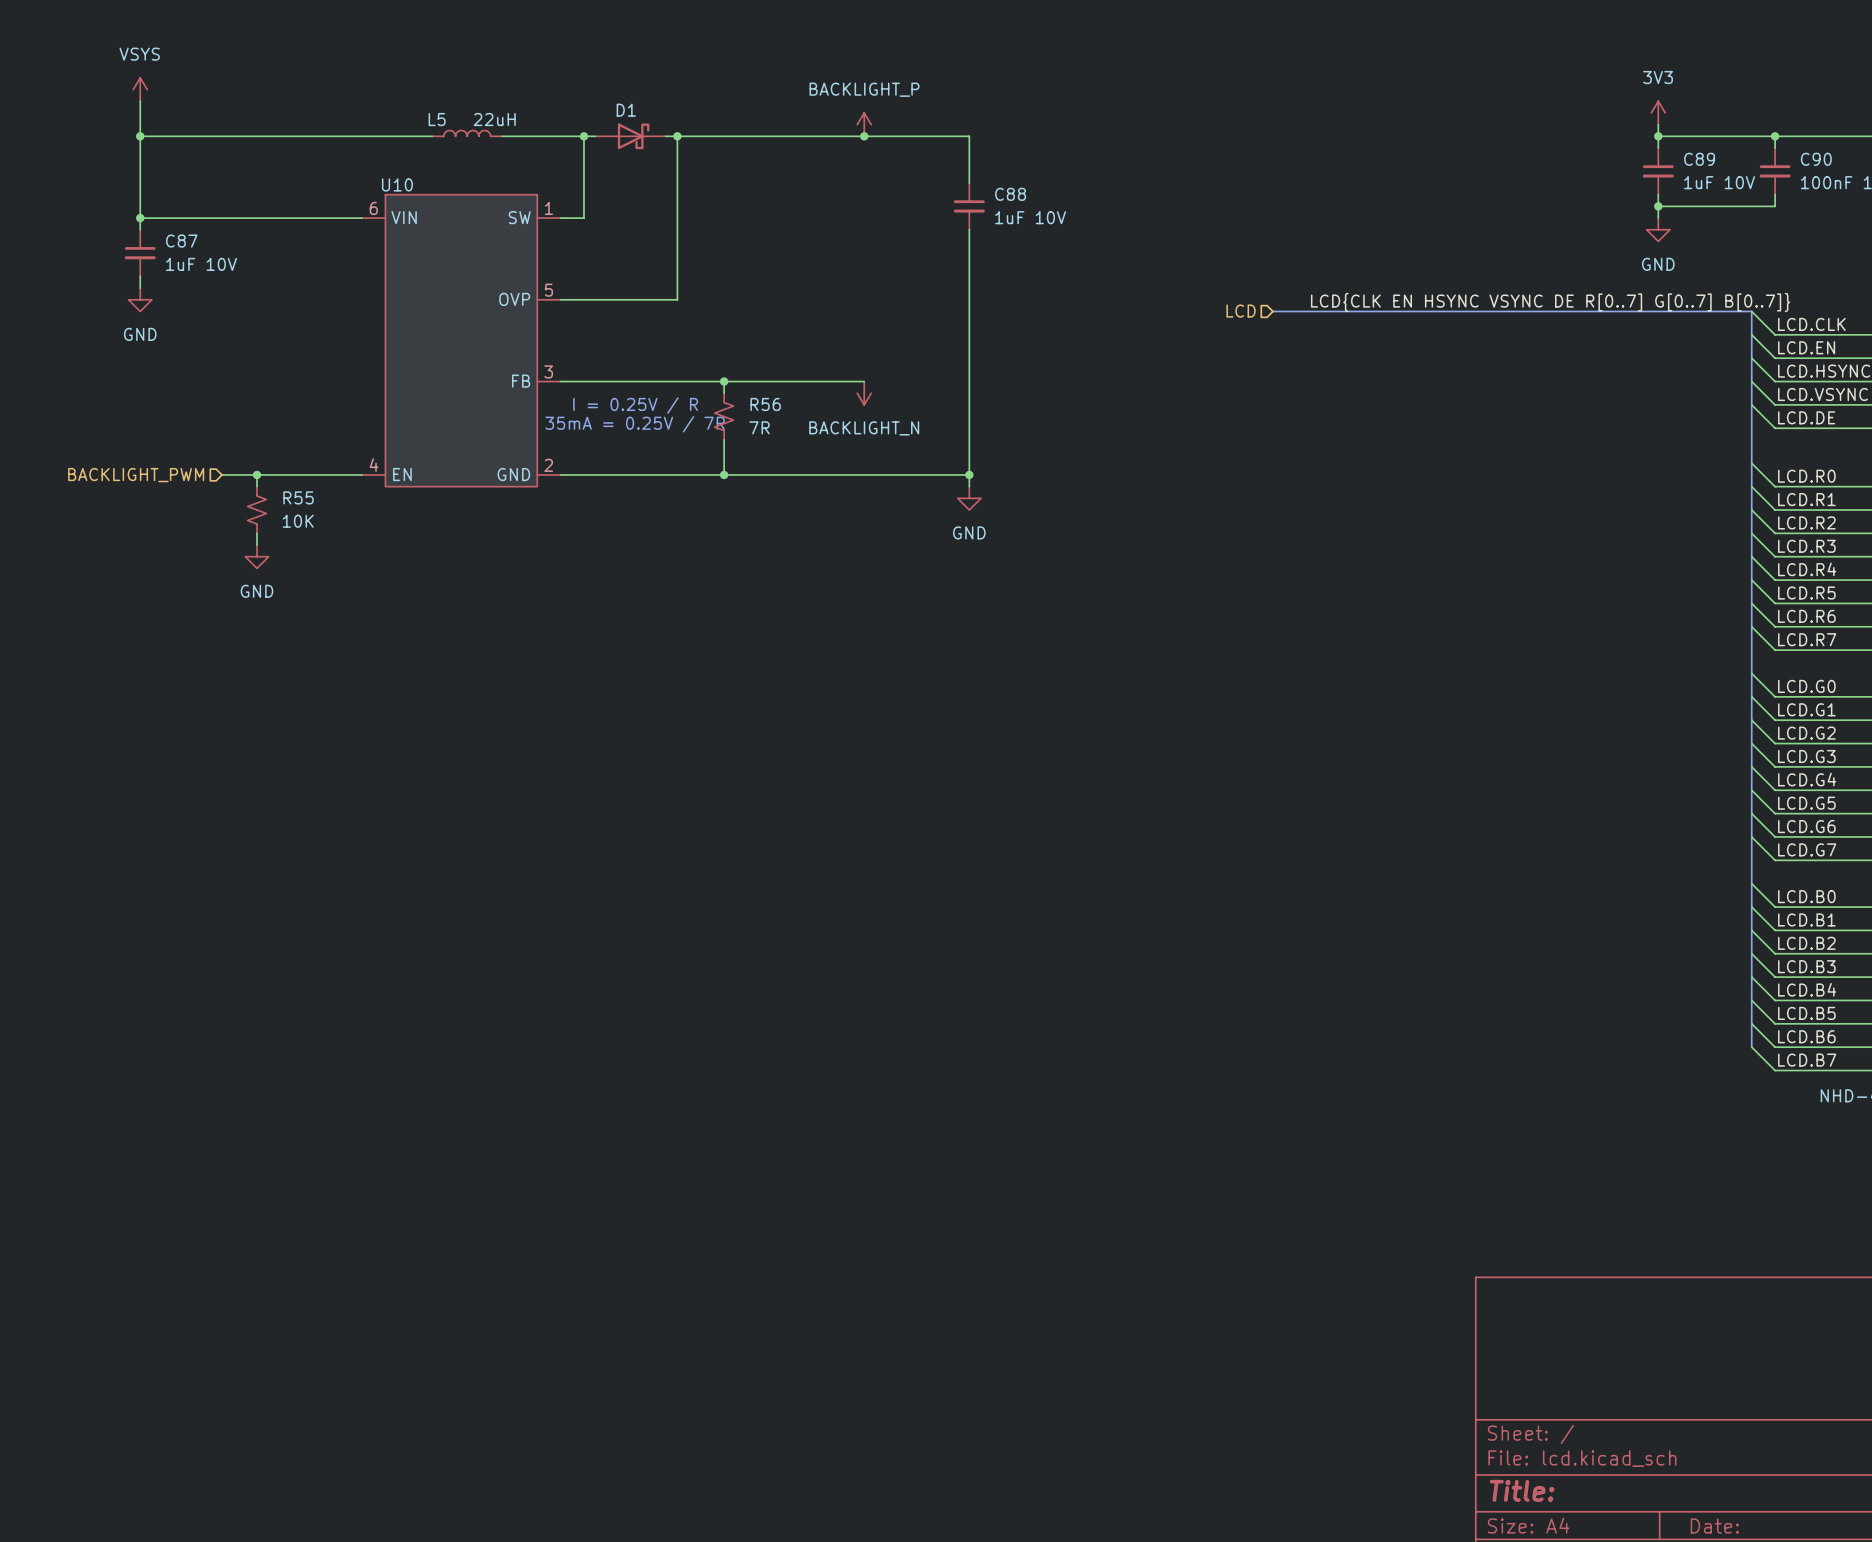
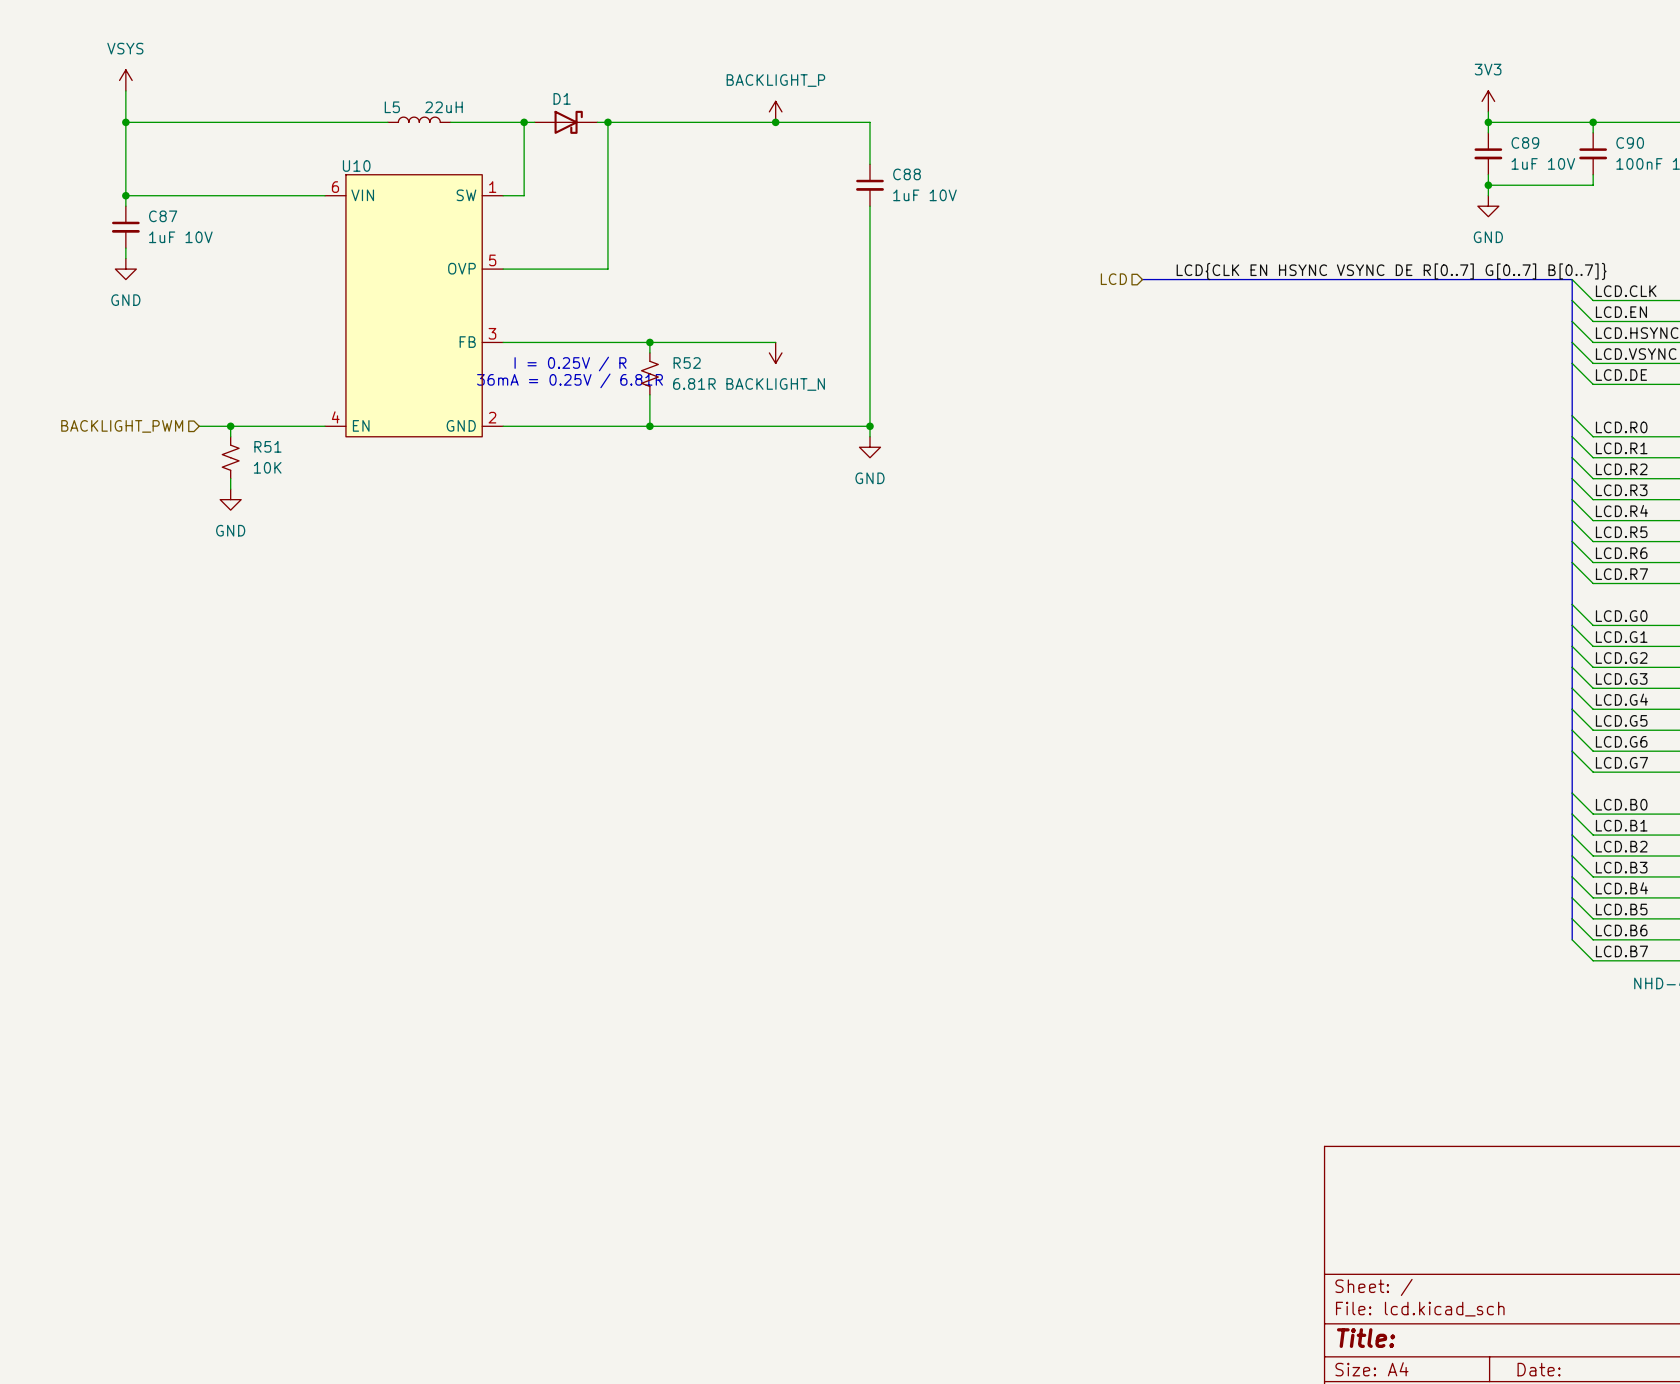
R56 name: R56 (765, 404) -> R52 (687, 363)
text: 35mA = 0.25V / 7R (635, 424) -> 36mA = 0.25V / 6.81R (570, 380)
R56 value: 7R (759, 427) -> 6.81R (694, 383)
R55 name: R55 (298, 497) -> R51 (267, 446)

